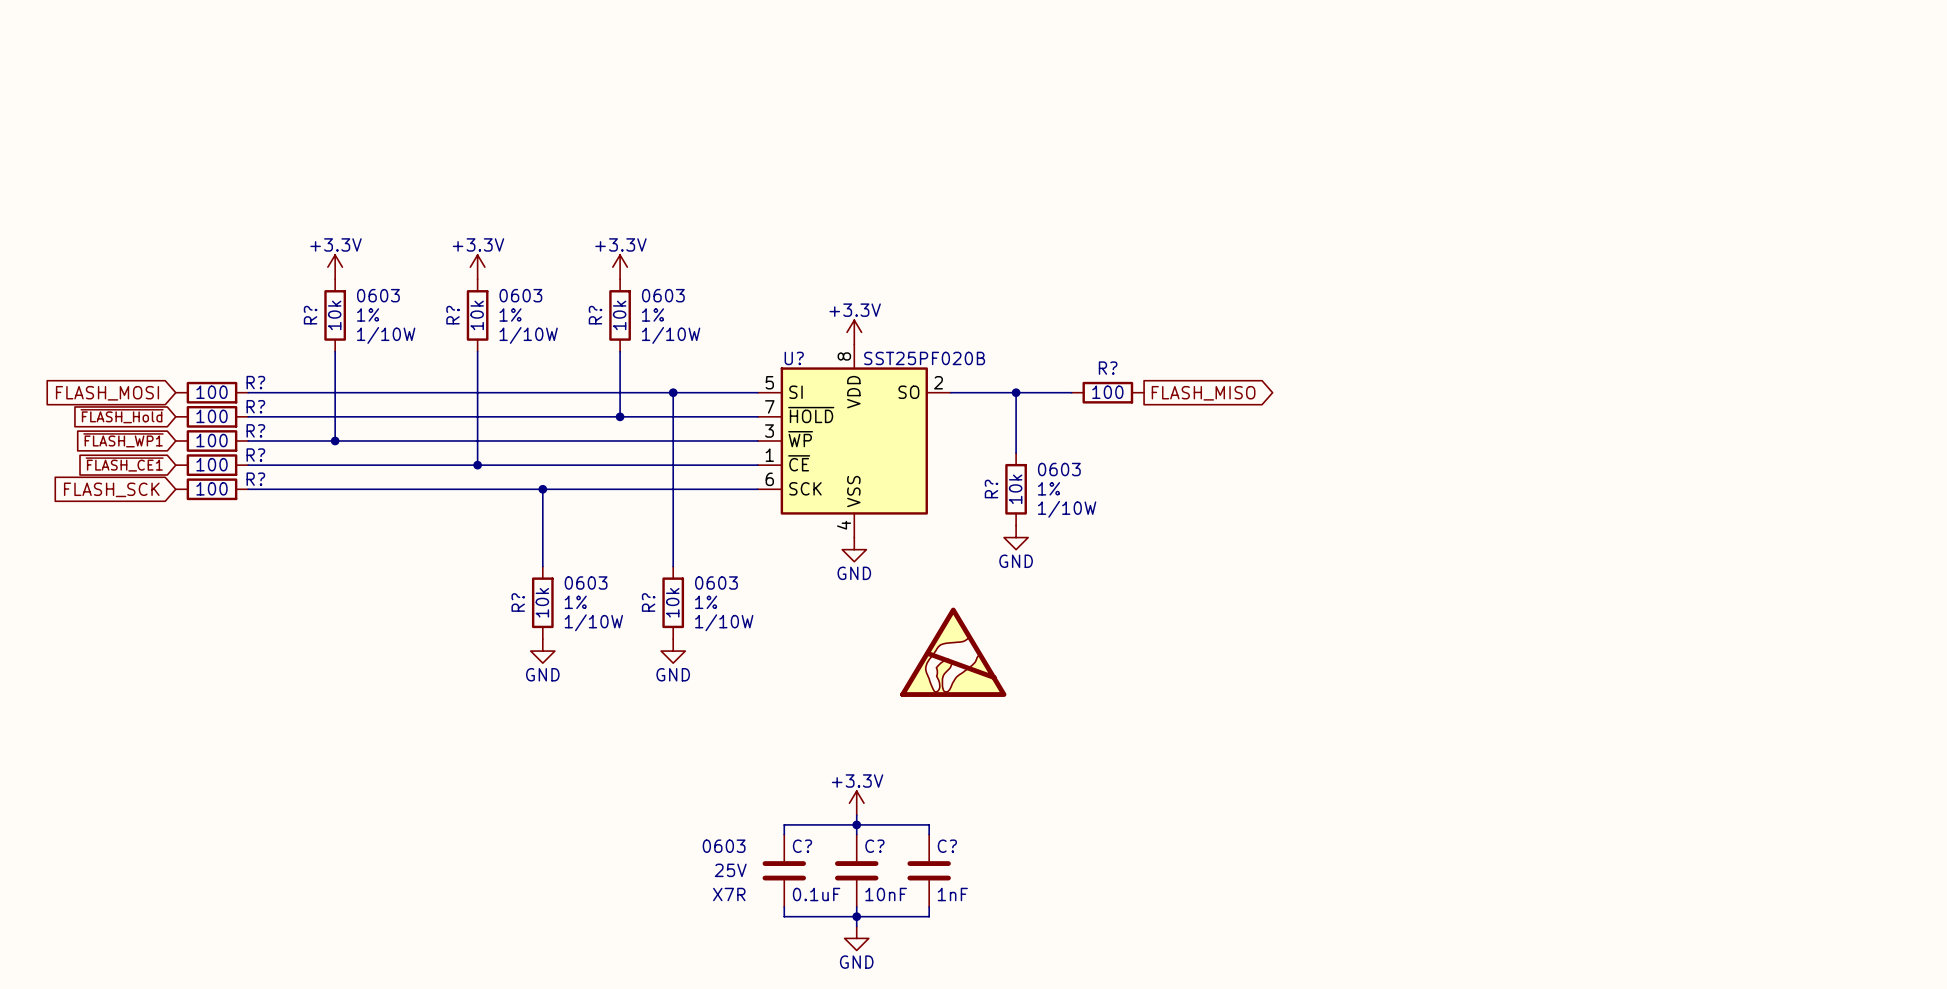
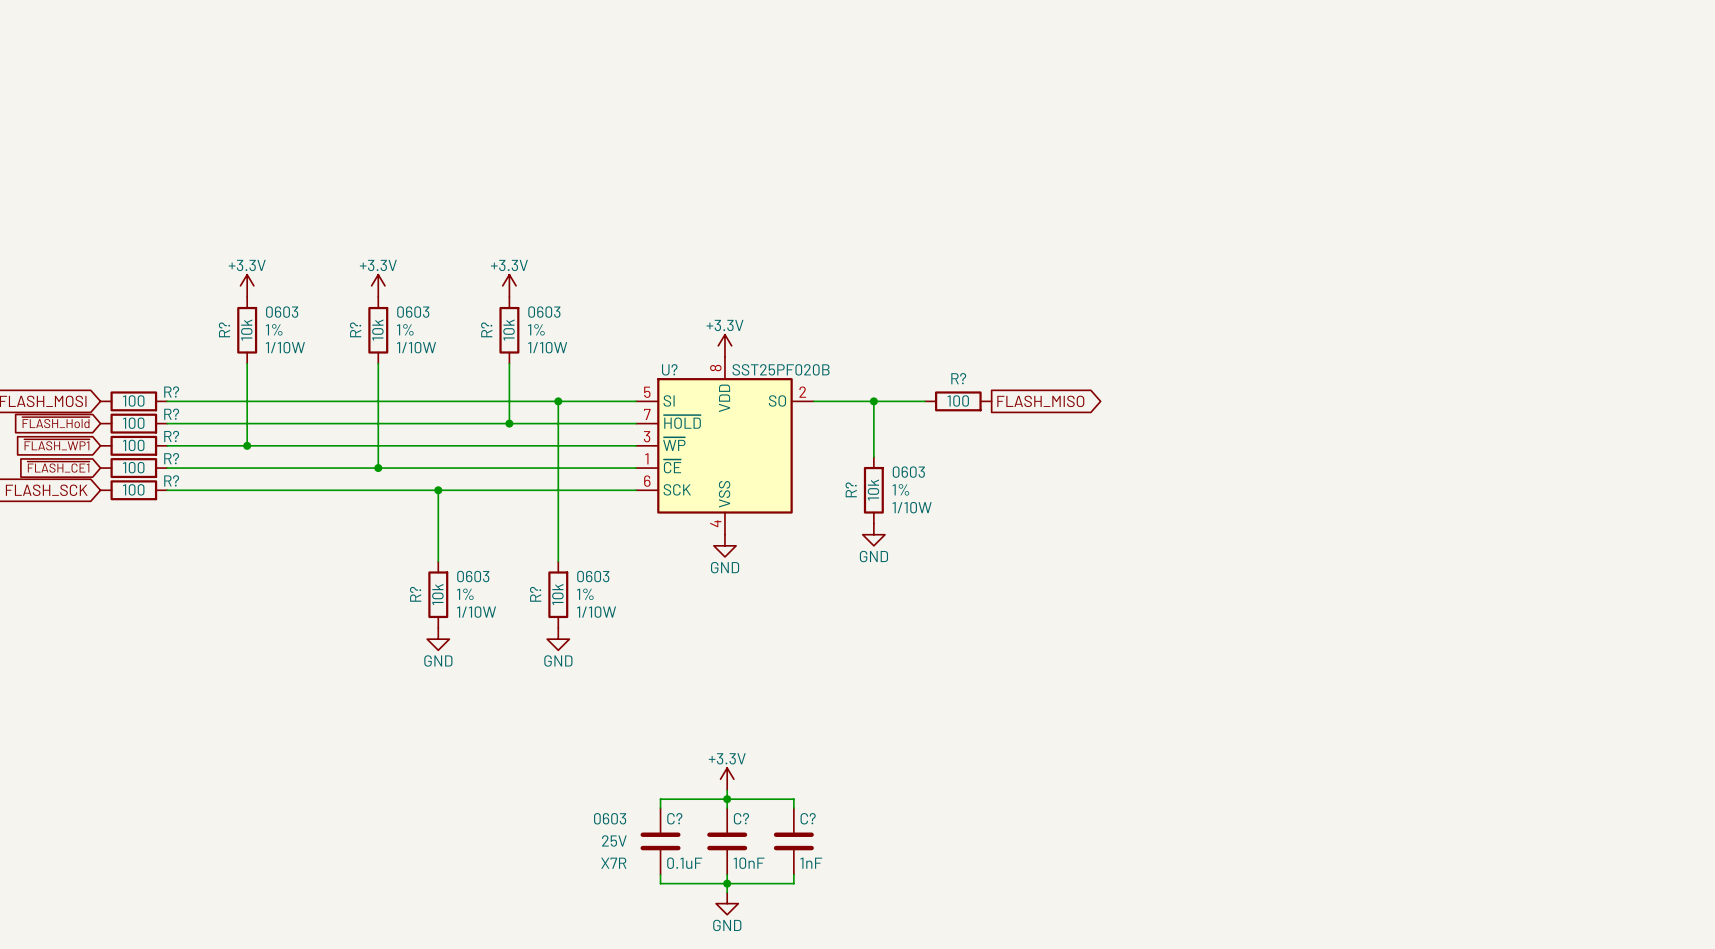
power symbol: (953, 652) -> none

